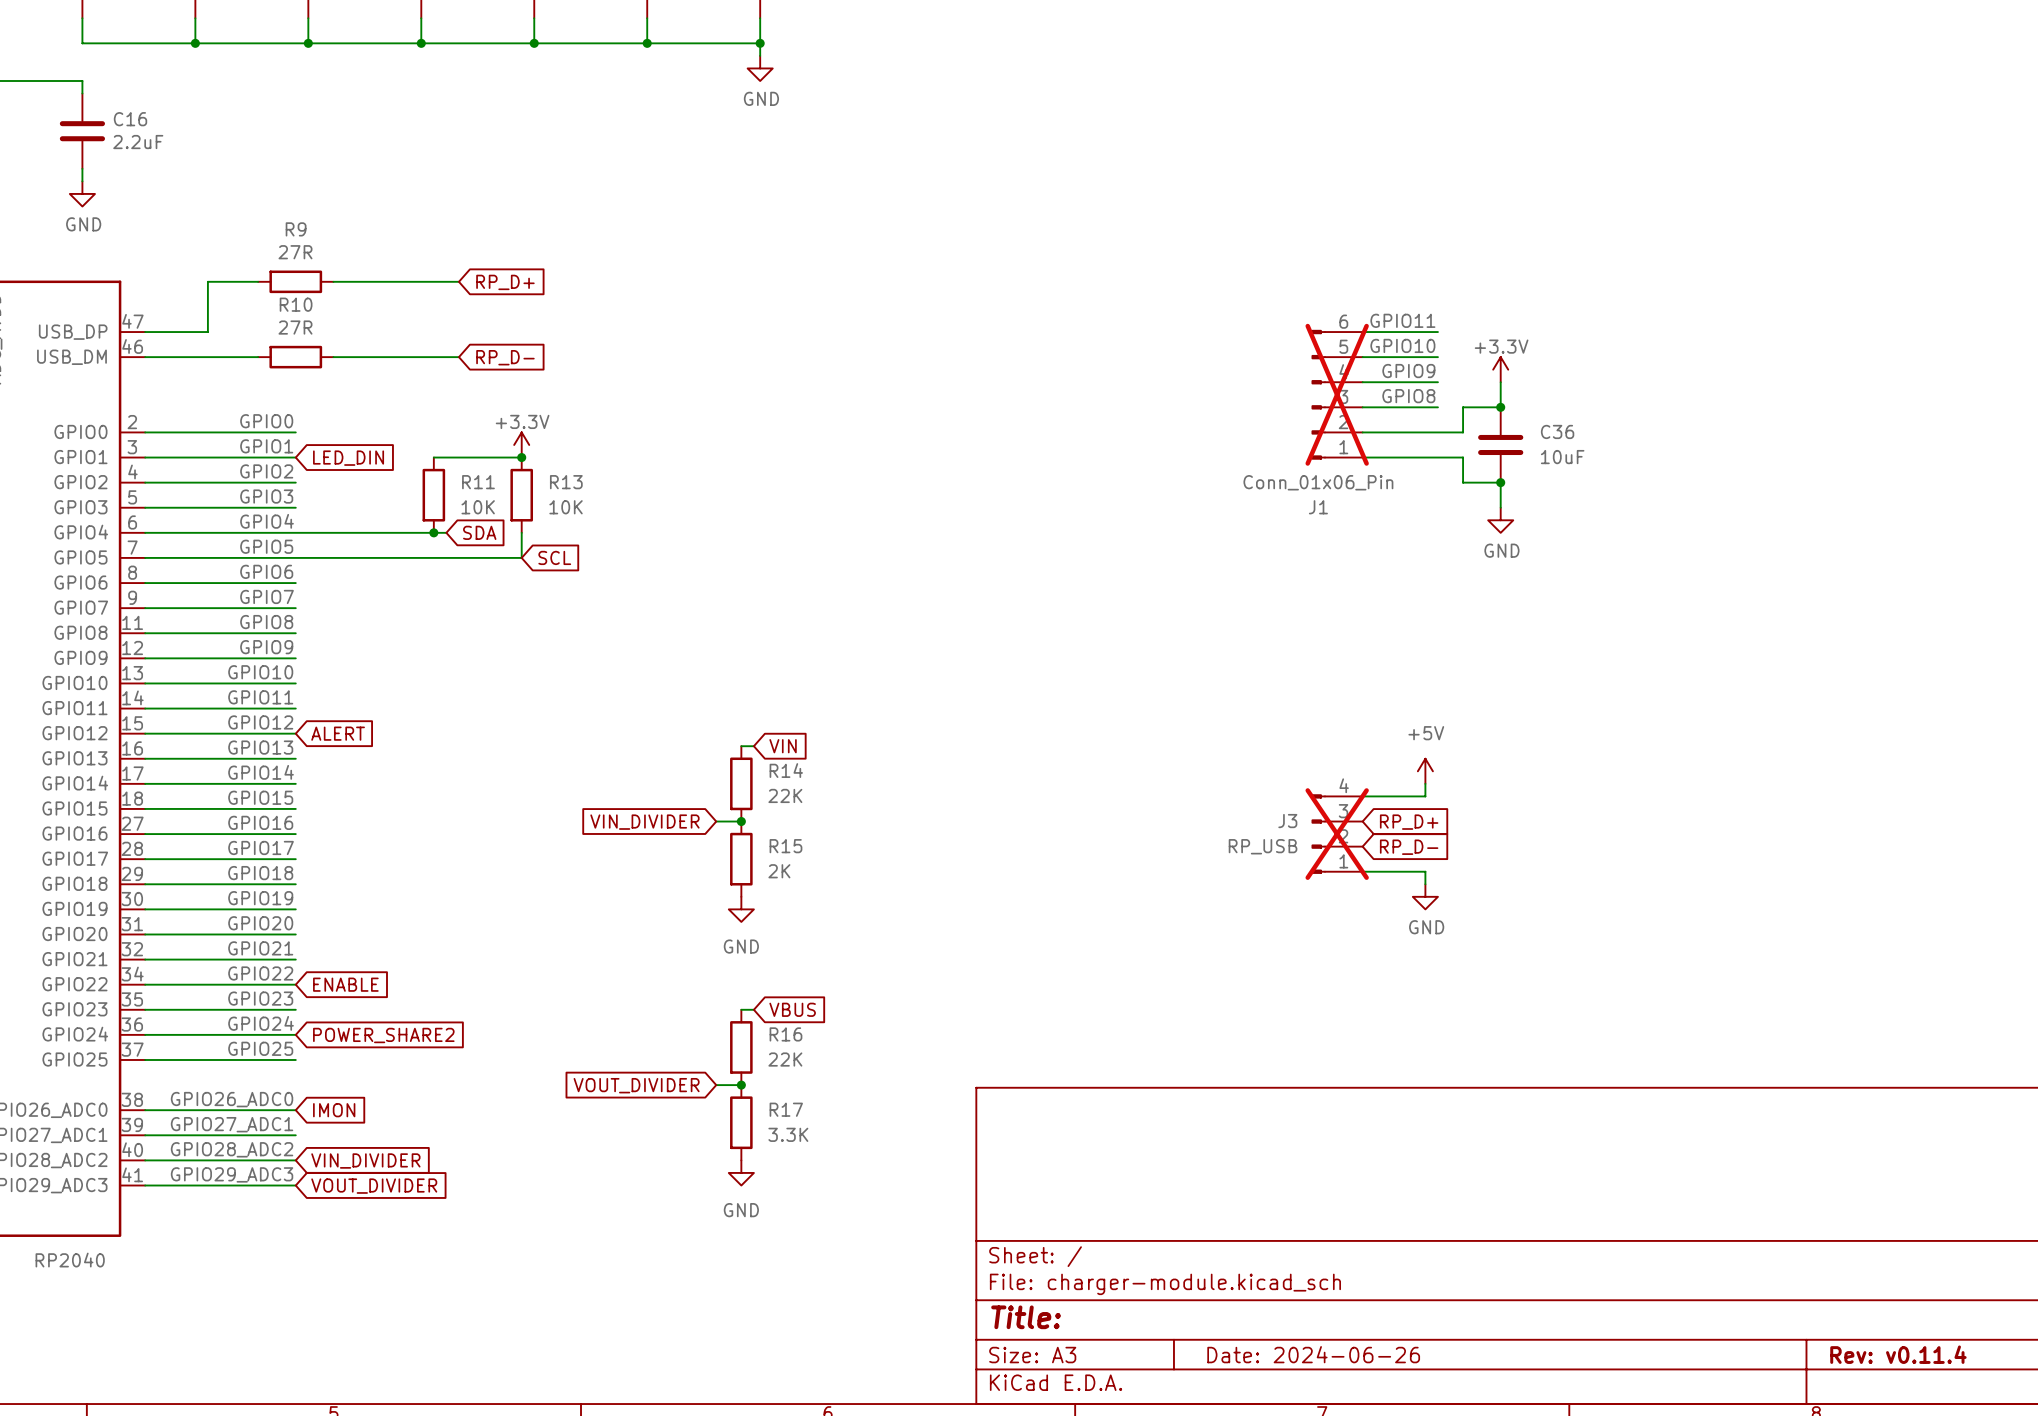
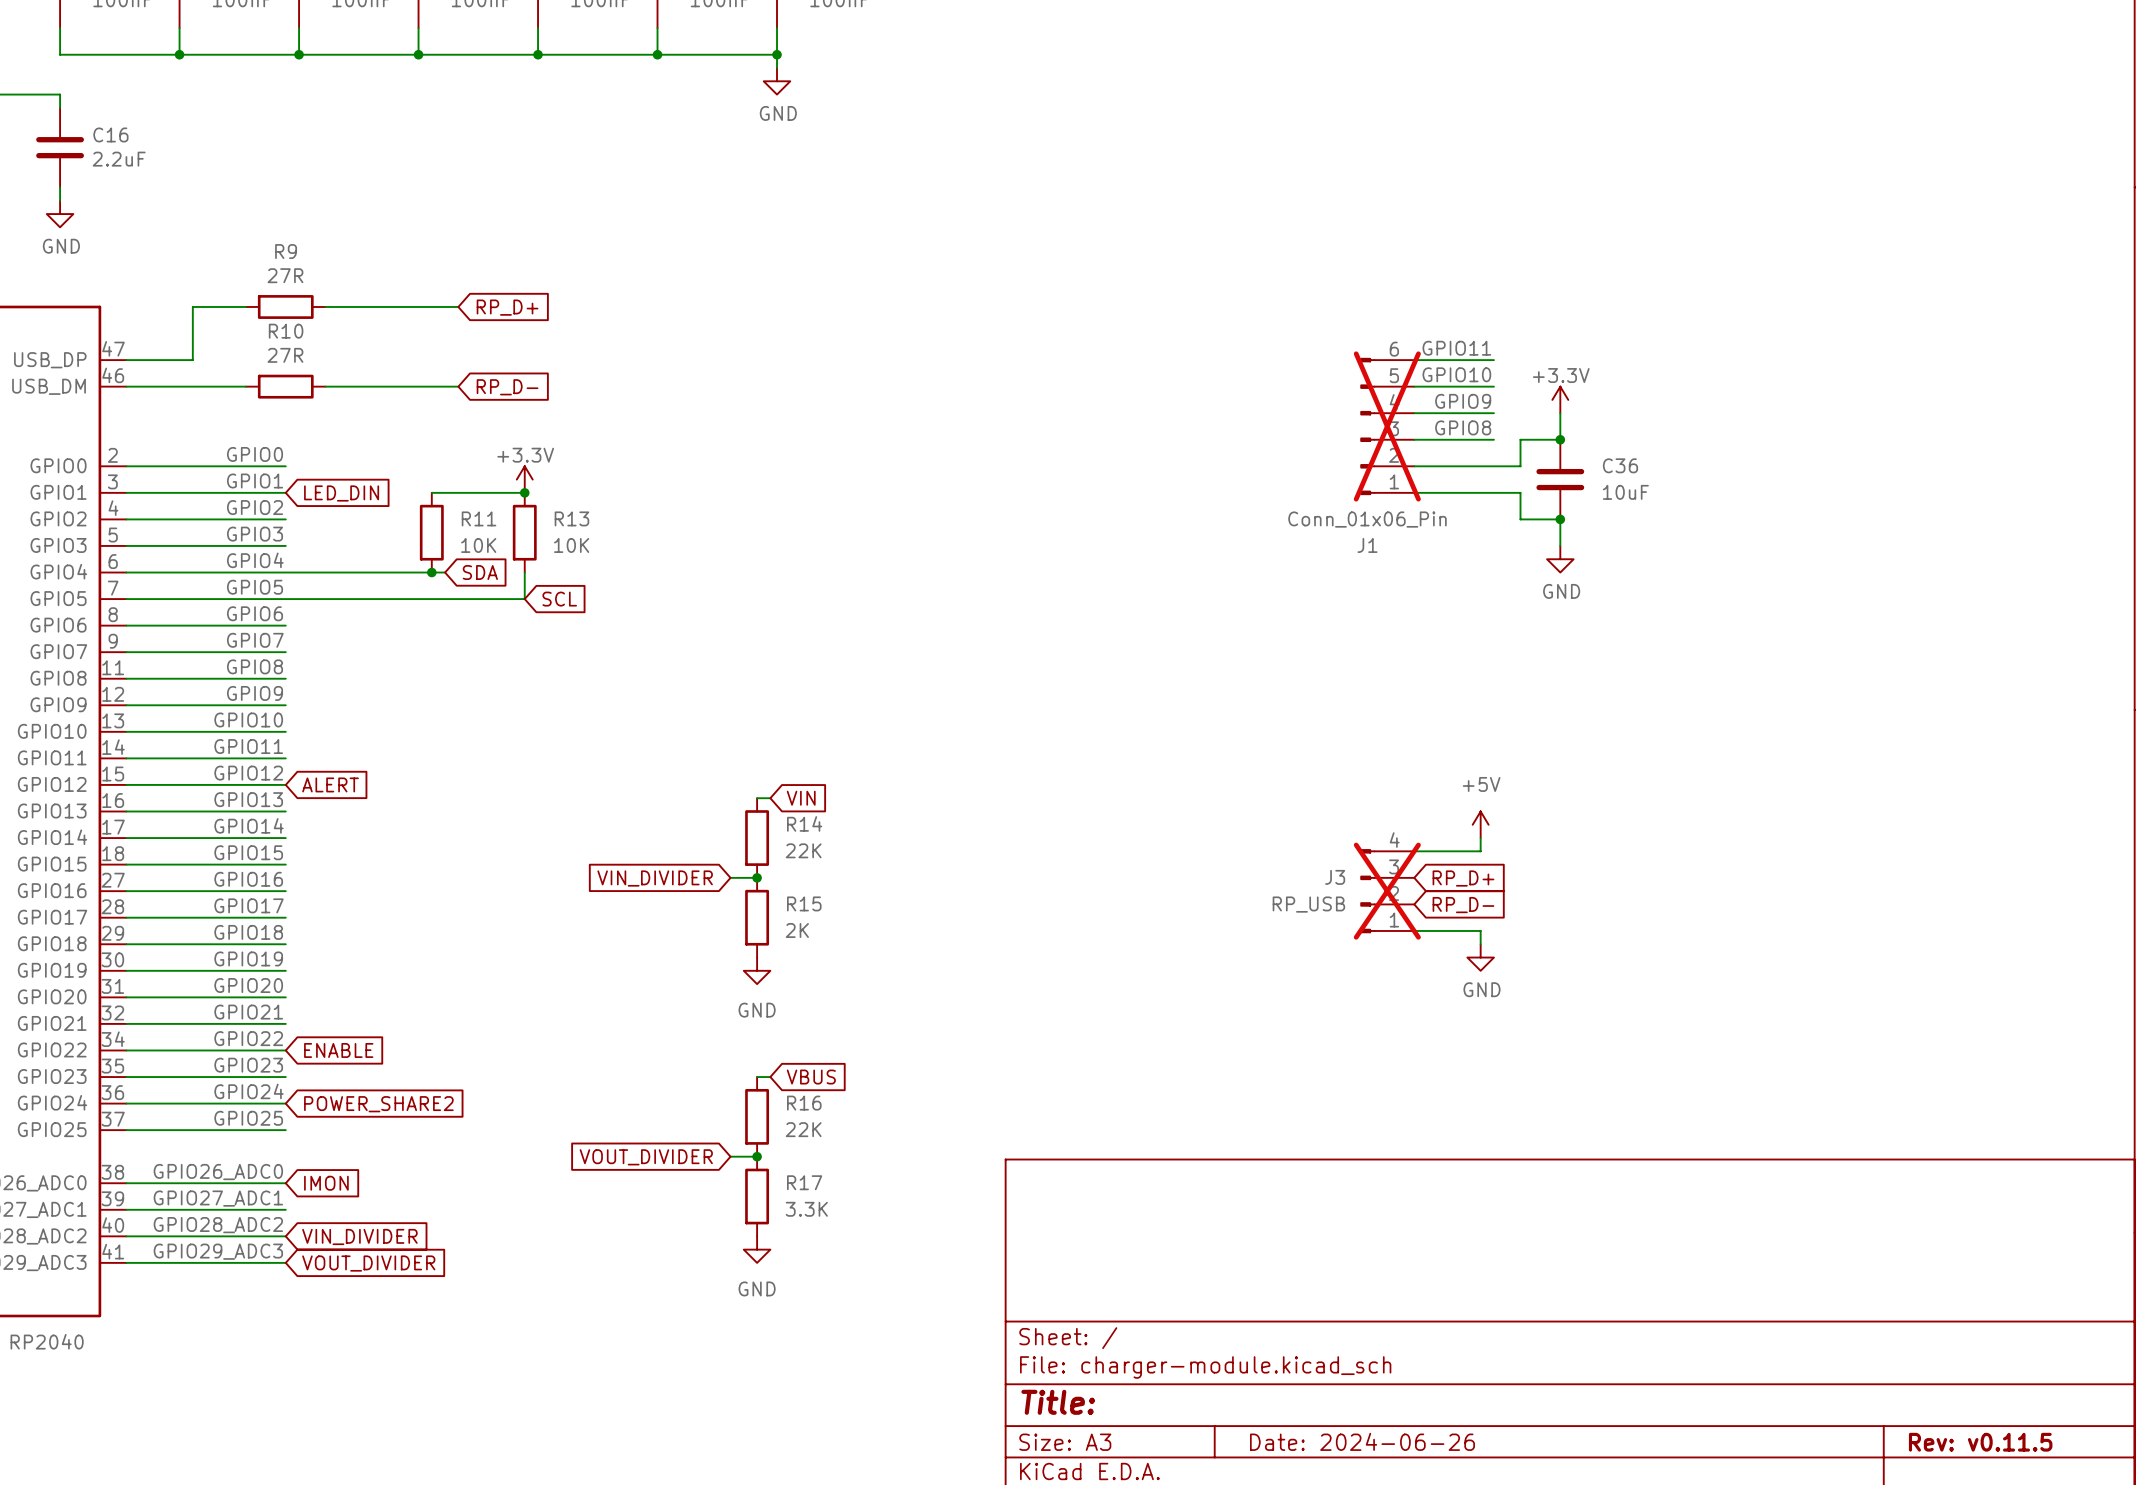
title block: Rev: v0.11.4 (1898, 1354) -> Rev: v0.11.5 (1980, 1442)

